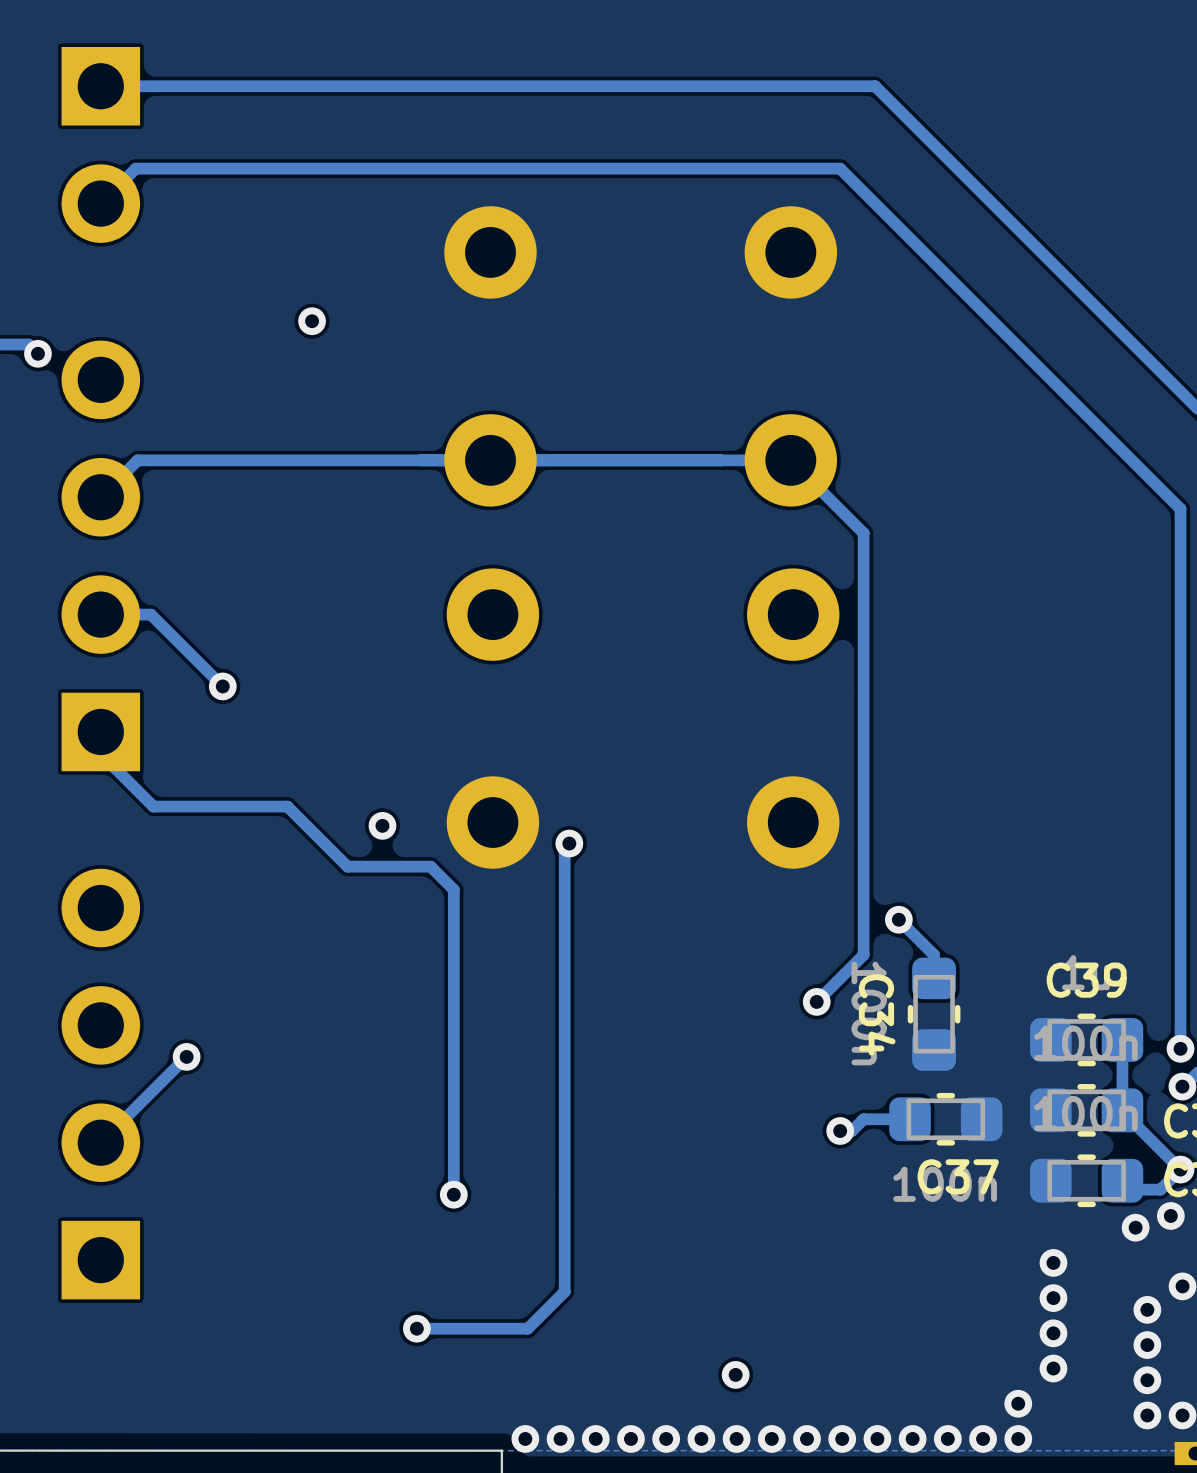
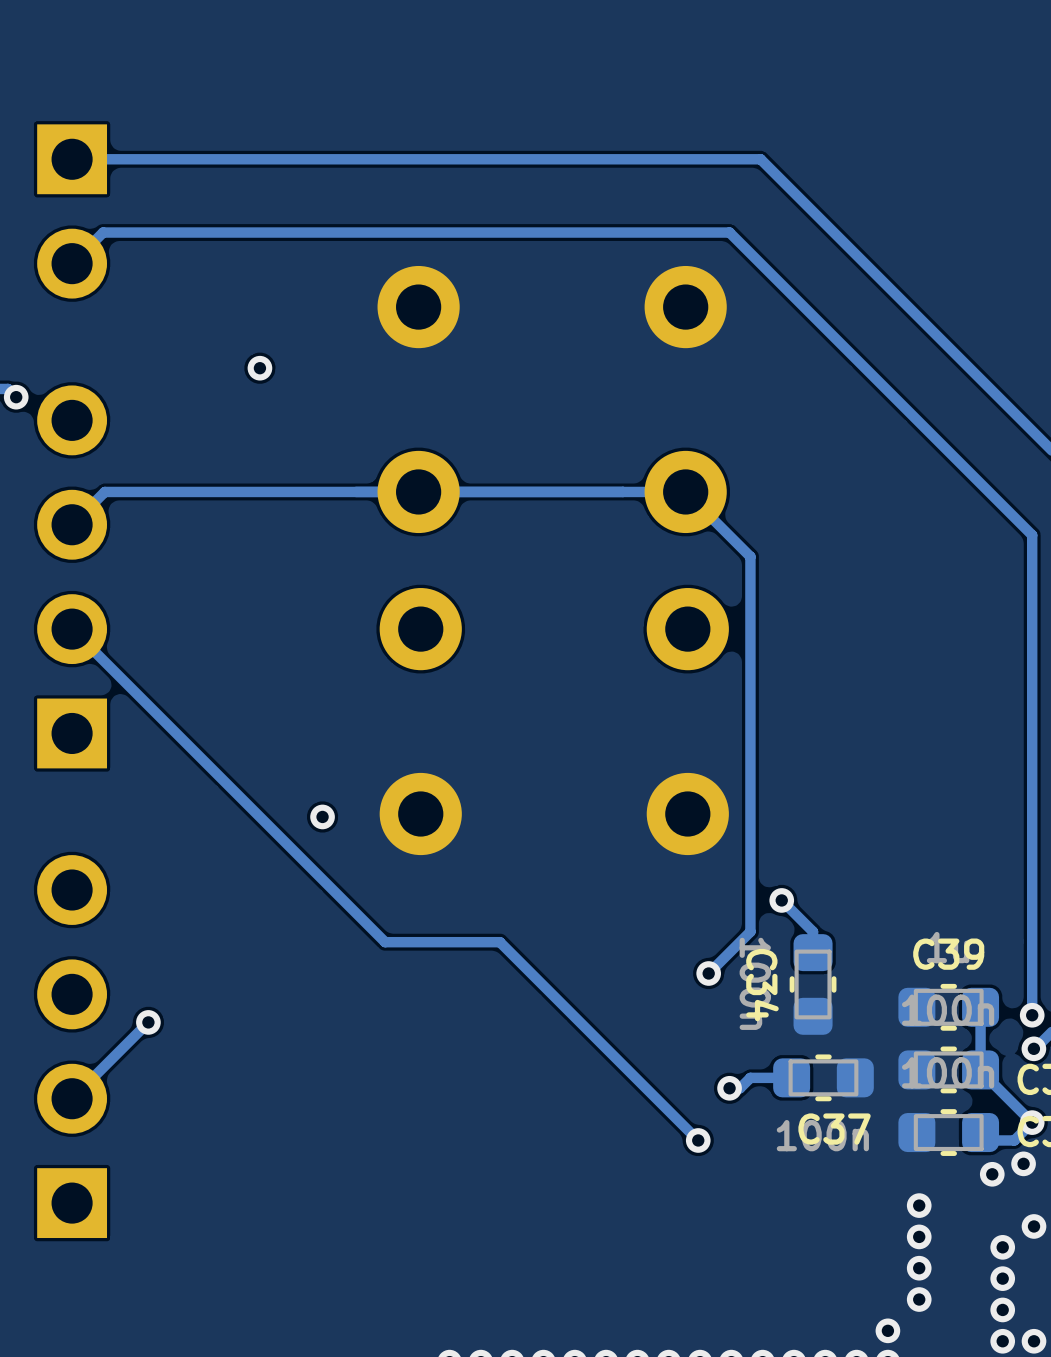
track: (100, 614) (150, 614) (222, 686) -> (72, 629) (385, 942) (499, 942) (698, 1140)
via: (222, 686) -> none
track: (100, 731) (100, 753) (153, 806) (287, 806) (347, 866) (430, 866) (453, 889) (453, 1194) -> none
track: (569, 843) (564, 848) (564, 1291) (527, 1328) (416, 1328) (421, 1324) -> none
via: (569, 843) -> none
via: none -> (698, 1140)
via: (453, 1194) -> none
via: (416, 1328) -> none
via: (735, 1374) -> none

